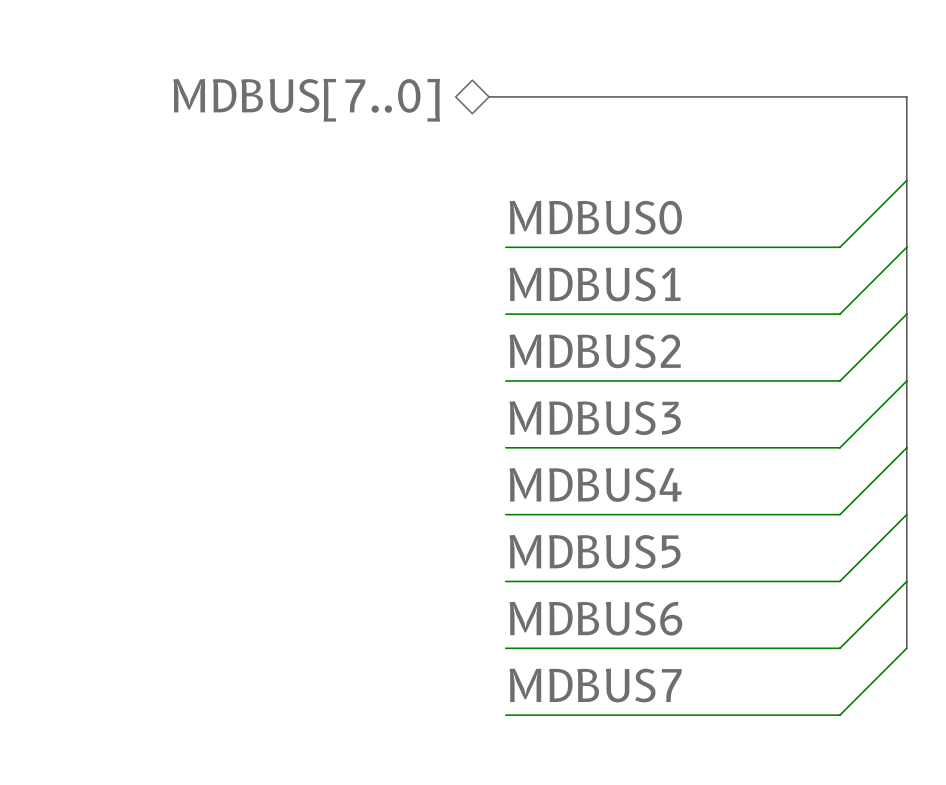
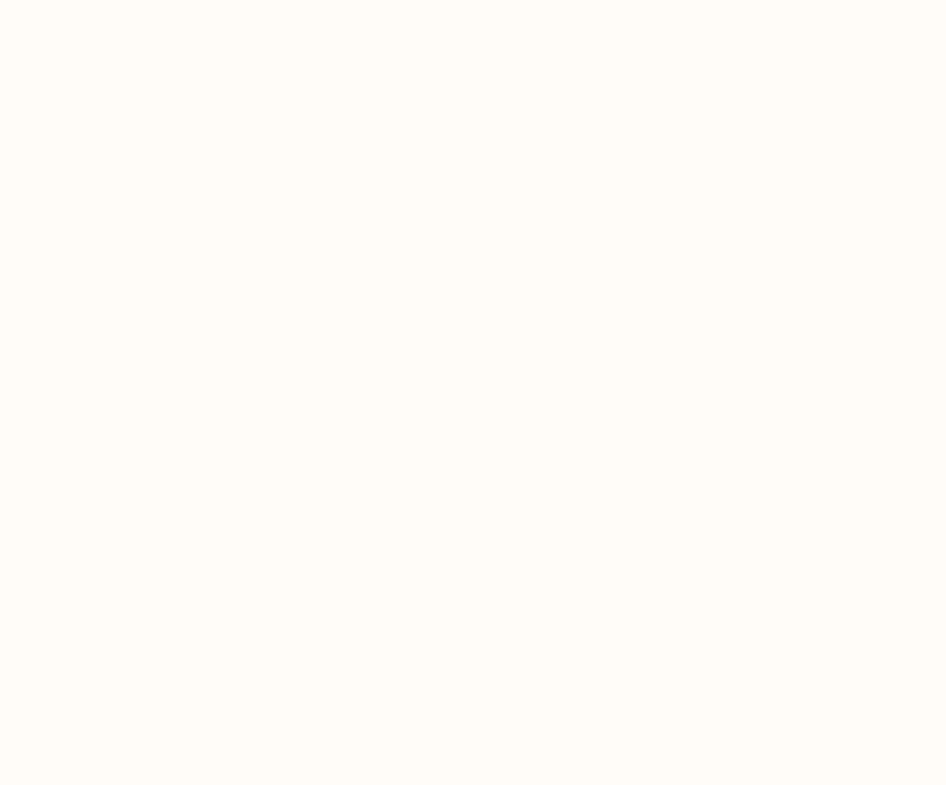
bus: (489, 96) (906, 96) (906, 648) -> none
hierarchical label: MDBUS[7..0] (306, 100) -> none
wire: (906, 180) (839, 247) (505, 247) -> none
label: MDBUS0 (595, 217) -> none
wire: (906, 247) (839, 314) (505, 314) -> none
label: MDBUS1 (595, 284) -> none
wire: (906, 314) (839, 380) (505, 380) -> none
label: MDBUS2 (595, 351) -> none
wire: (906, 380) (839, 447) (505, 447) -> none
label: MDBUS3 (595, 418) -> none
wire: (906, 447) (839, 514) (505, 514) -> none
label: MDBUS4 (595, 485) -> none
wire: (906, 514) (839, 581) (505, 581) -> none
label: MDBUS5 (595, 551) -> none
wire: (906, 581) (839, 648) (505, 648) -> none
label: MDBUS6 (595, 618) -> none
wire: (906, 648) (839, 715) (505, 715) -> none
label: MDBUS7 (595, 685) -> none

